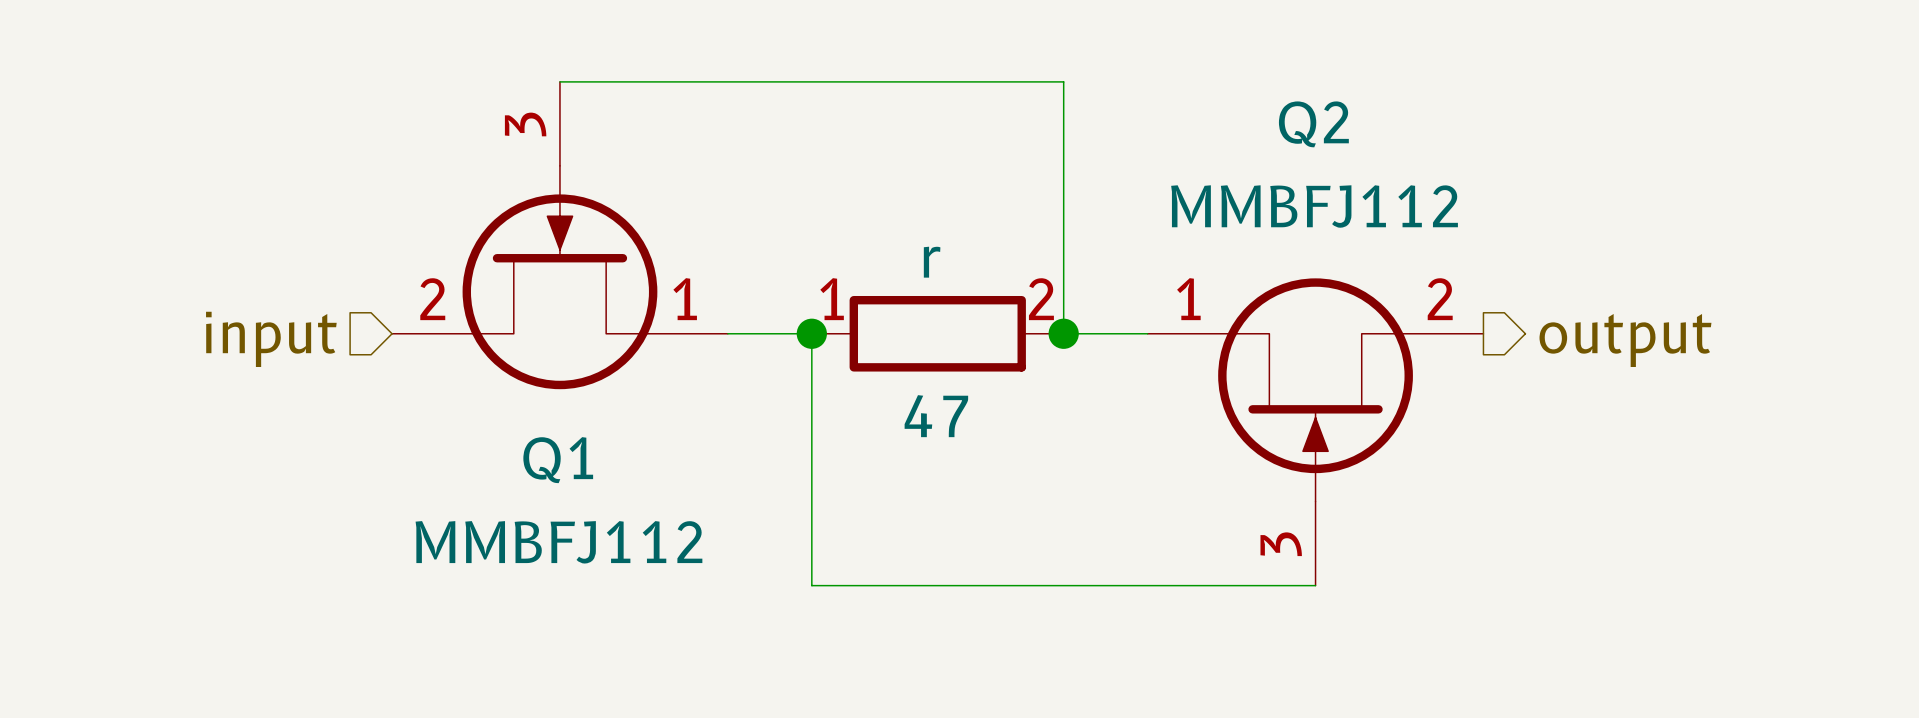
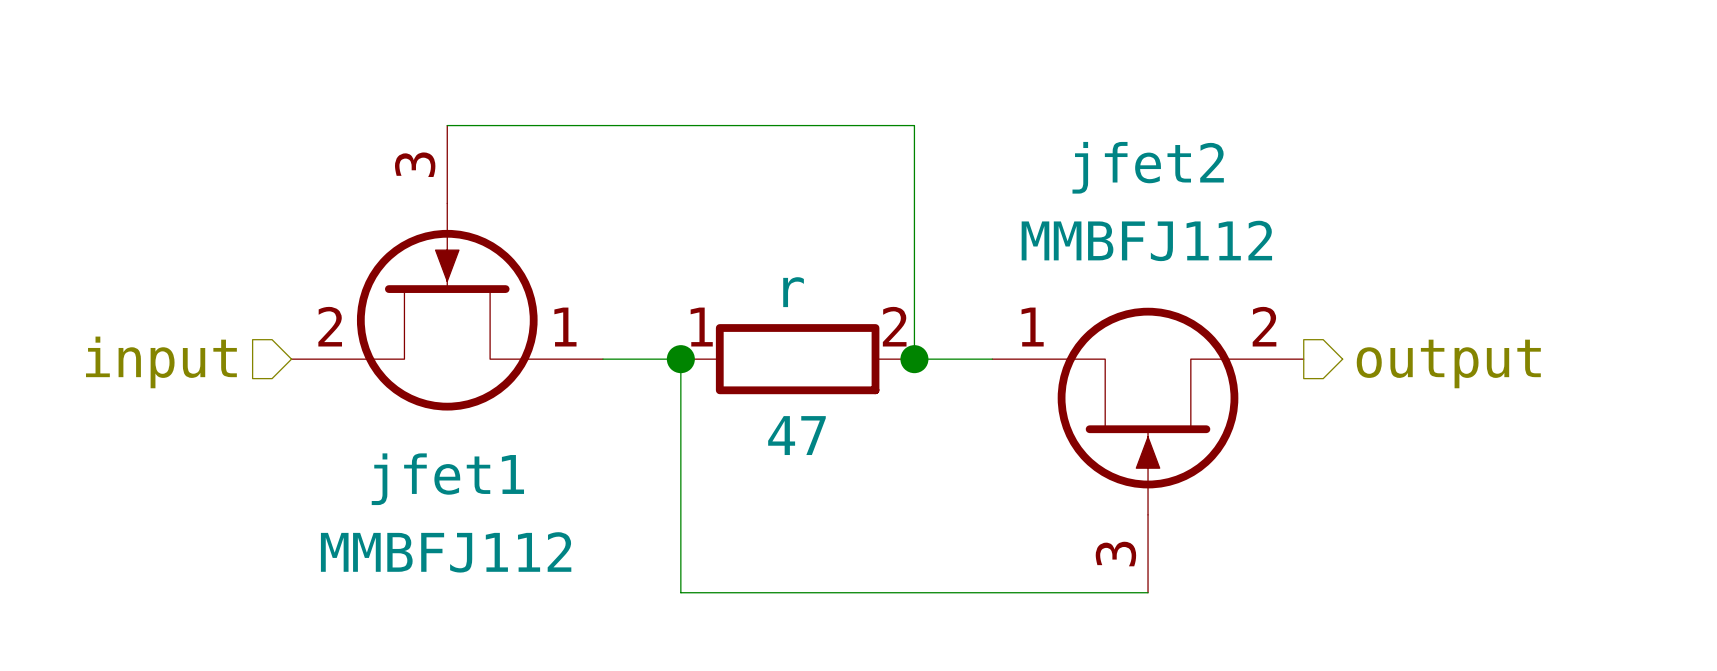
Q2 name: Q2 (1313, 124) -> jfet2 (1148, 167)
Q1 name: Q1 (558, 460) -> jfet1 (447, 479)

